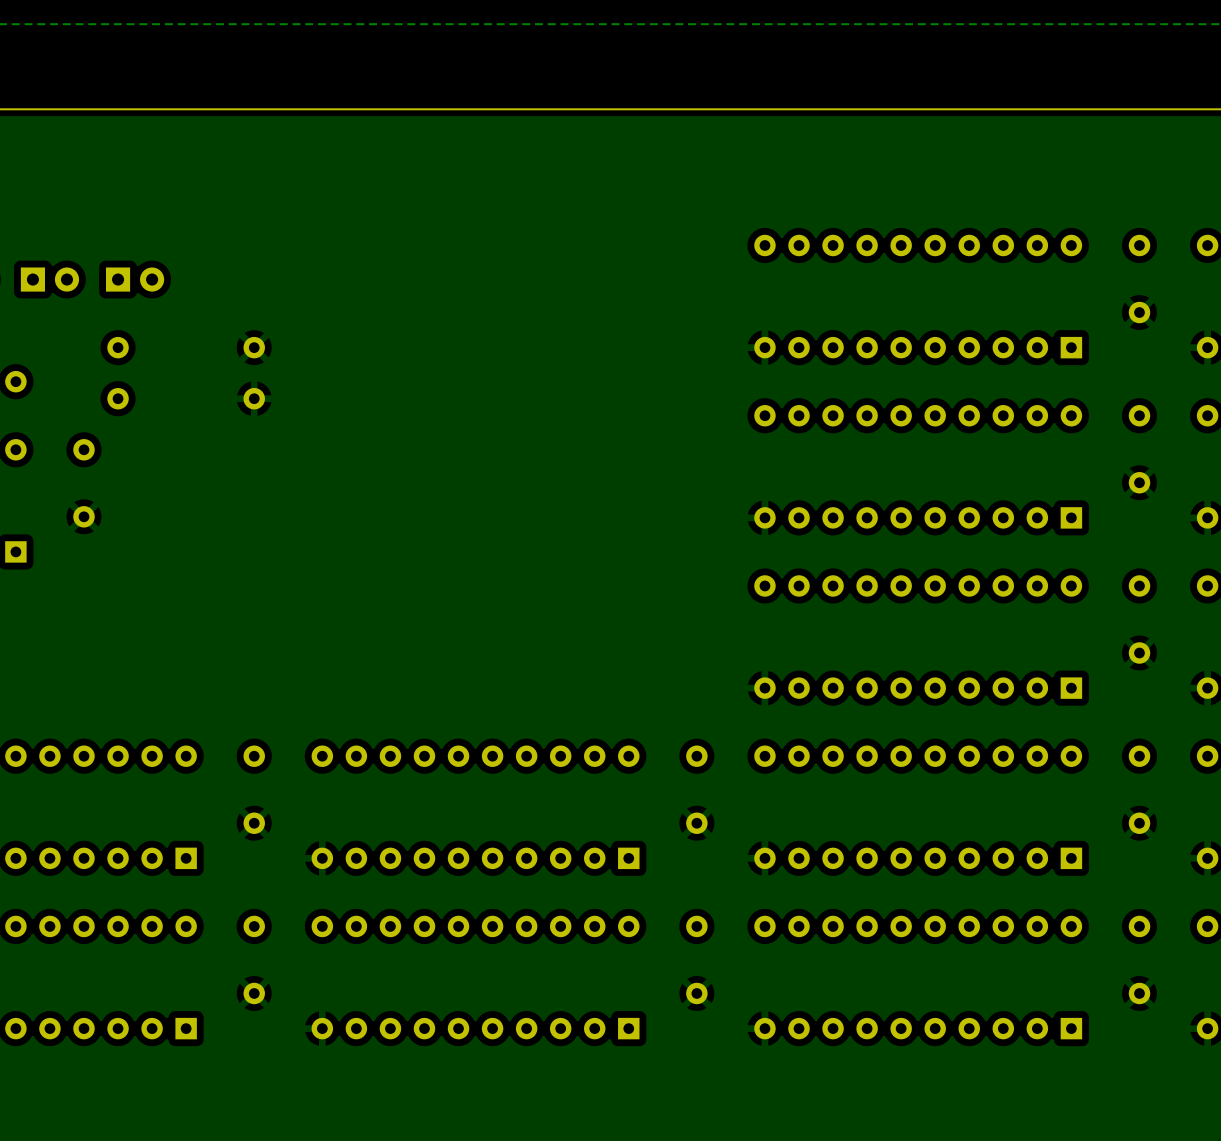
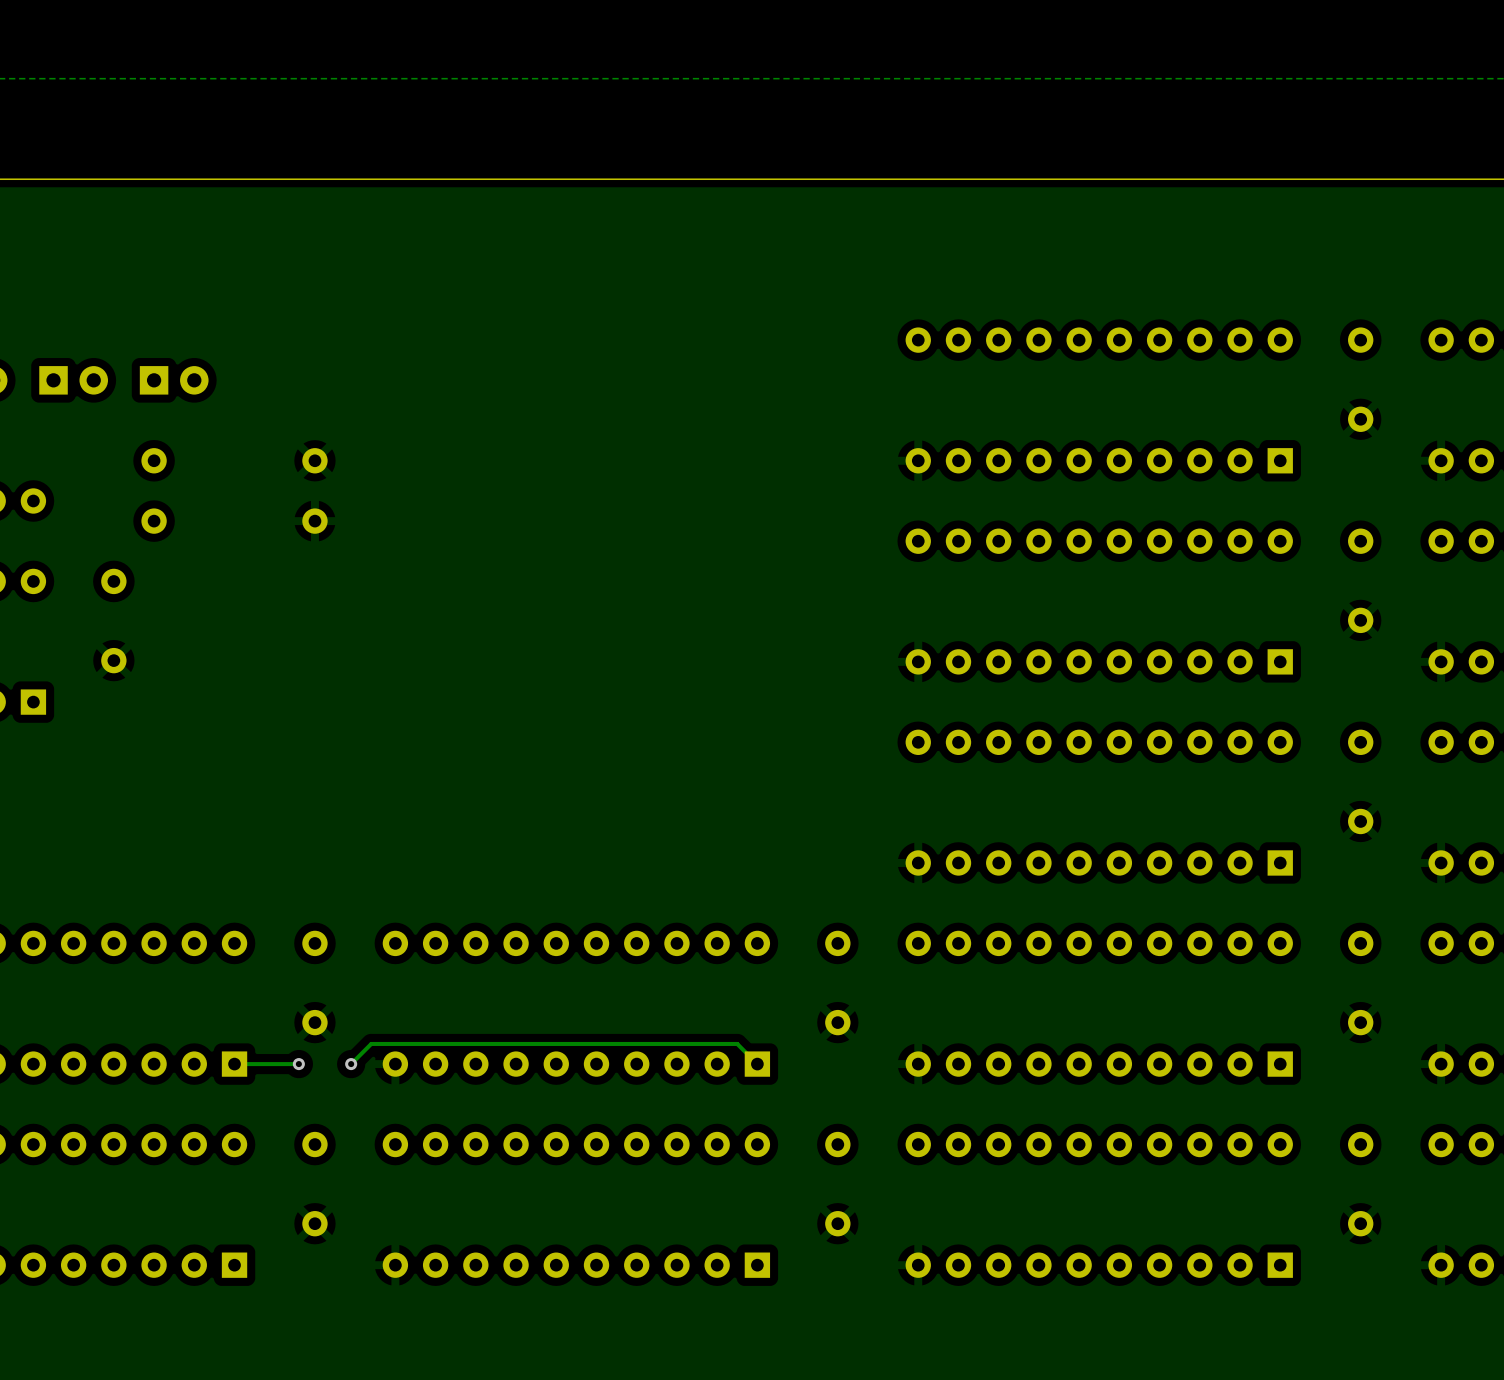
track: none -> (298, 1064) (234, 1064)
via: none -> (298, 1064)
via: none -> (351, 1064)
track: none -> (757, 1064) (737, 1043) (371, 1043) (351, 1064)

